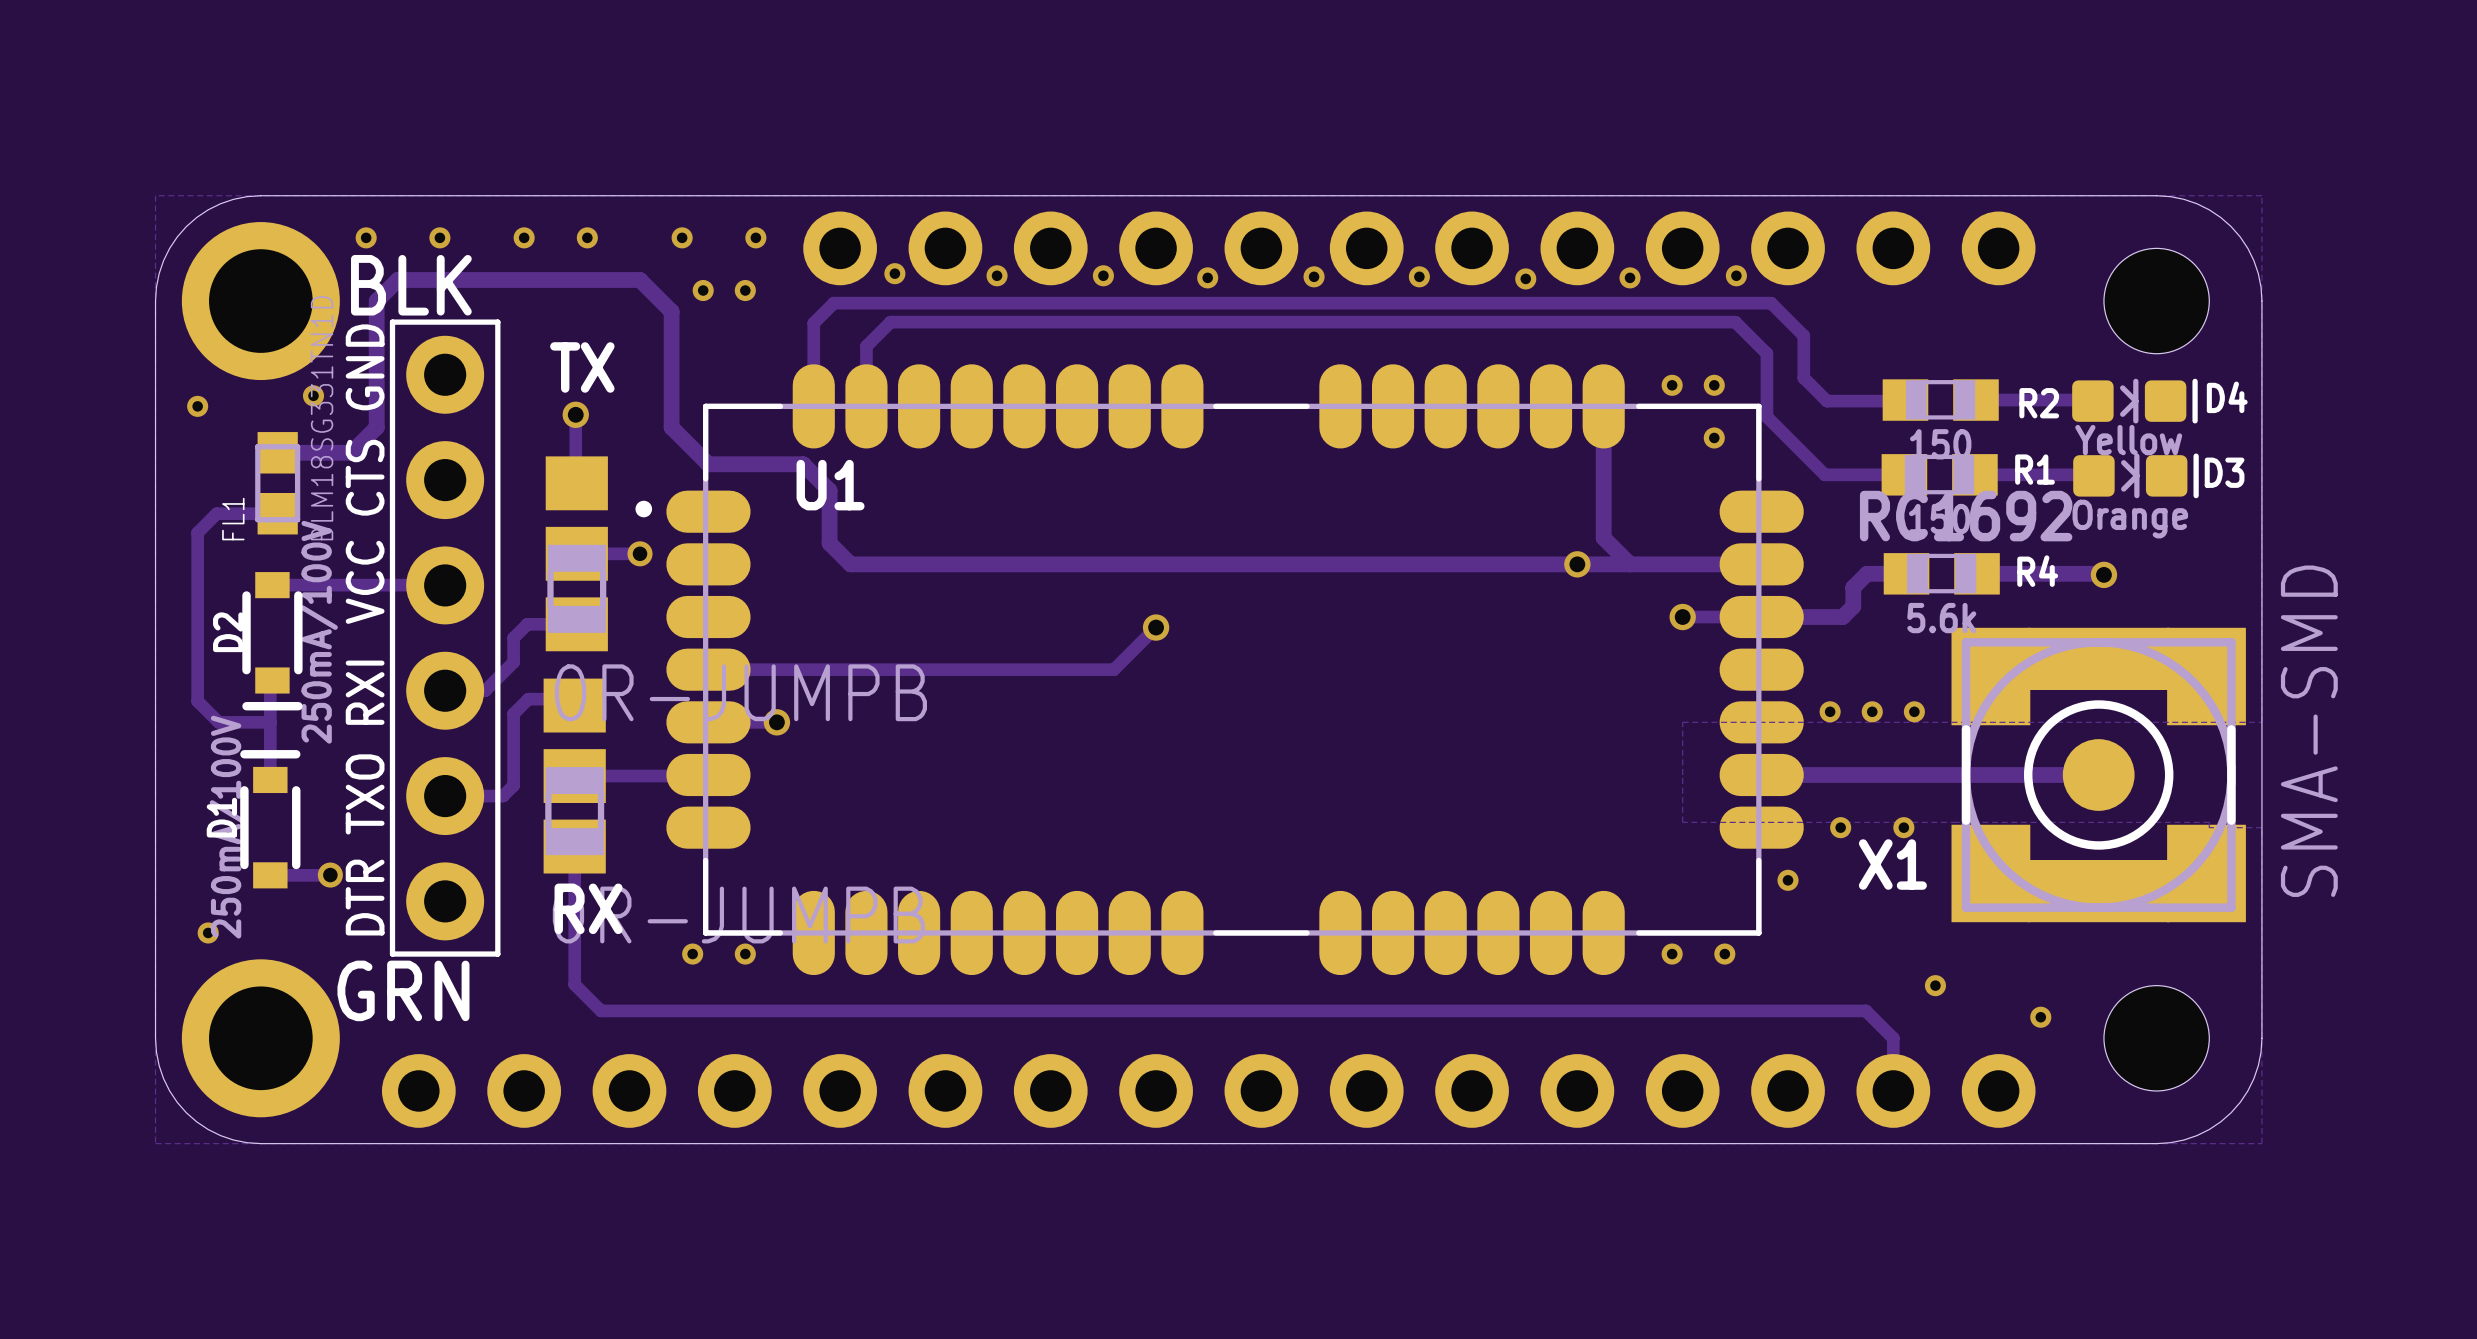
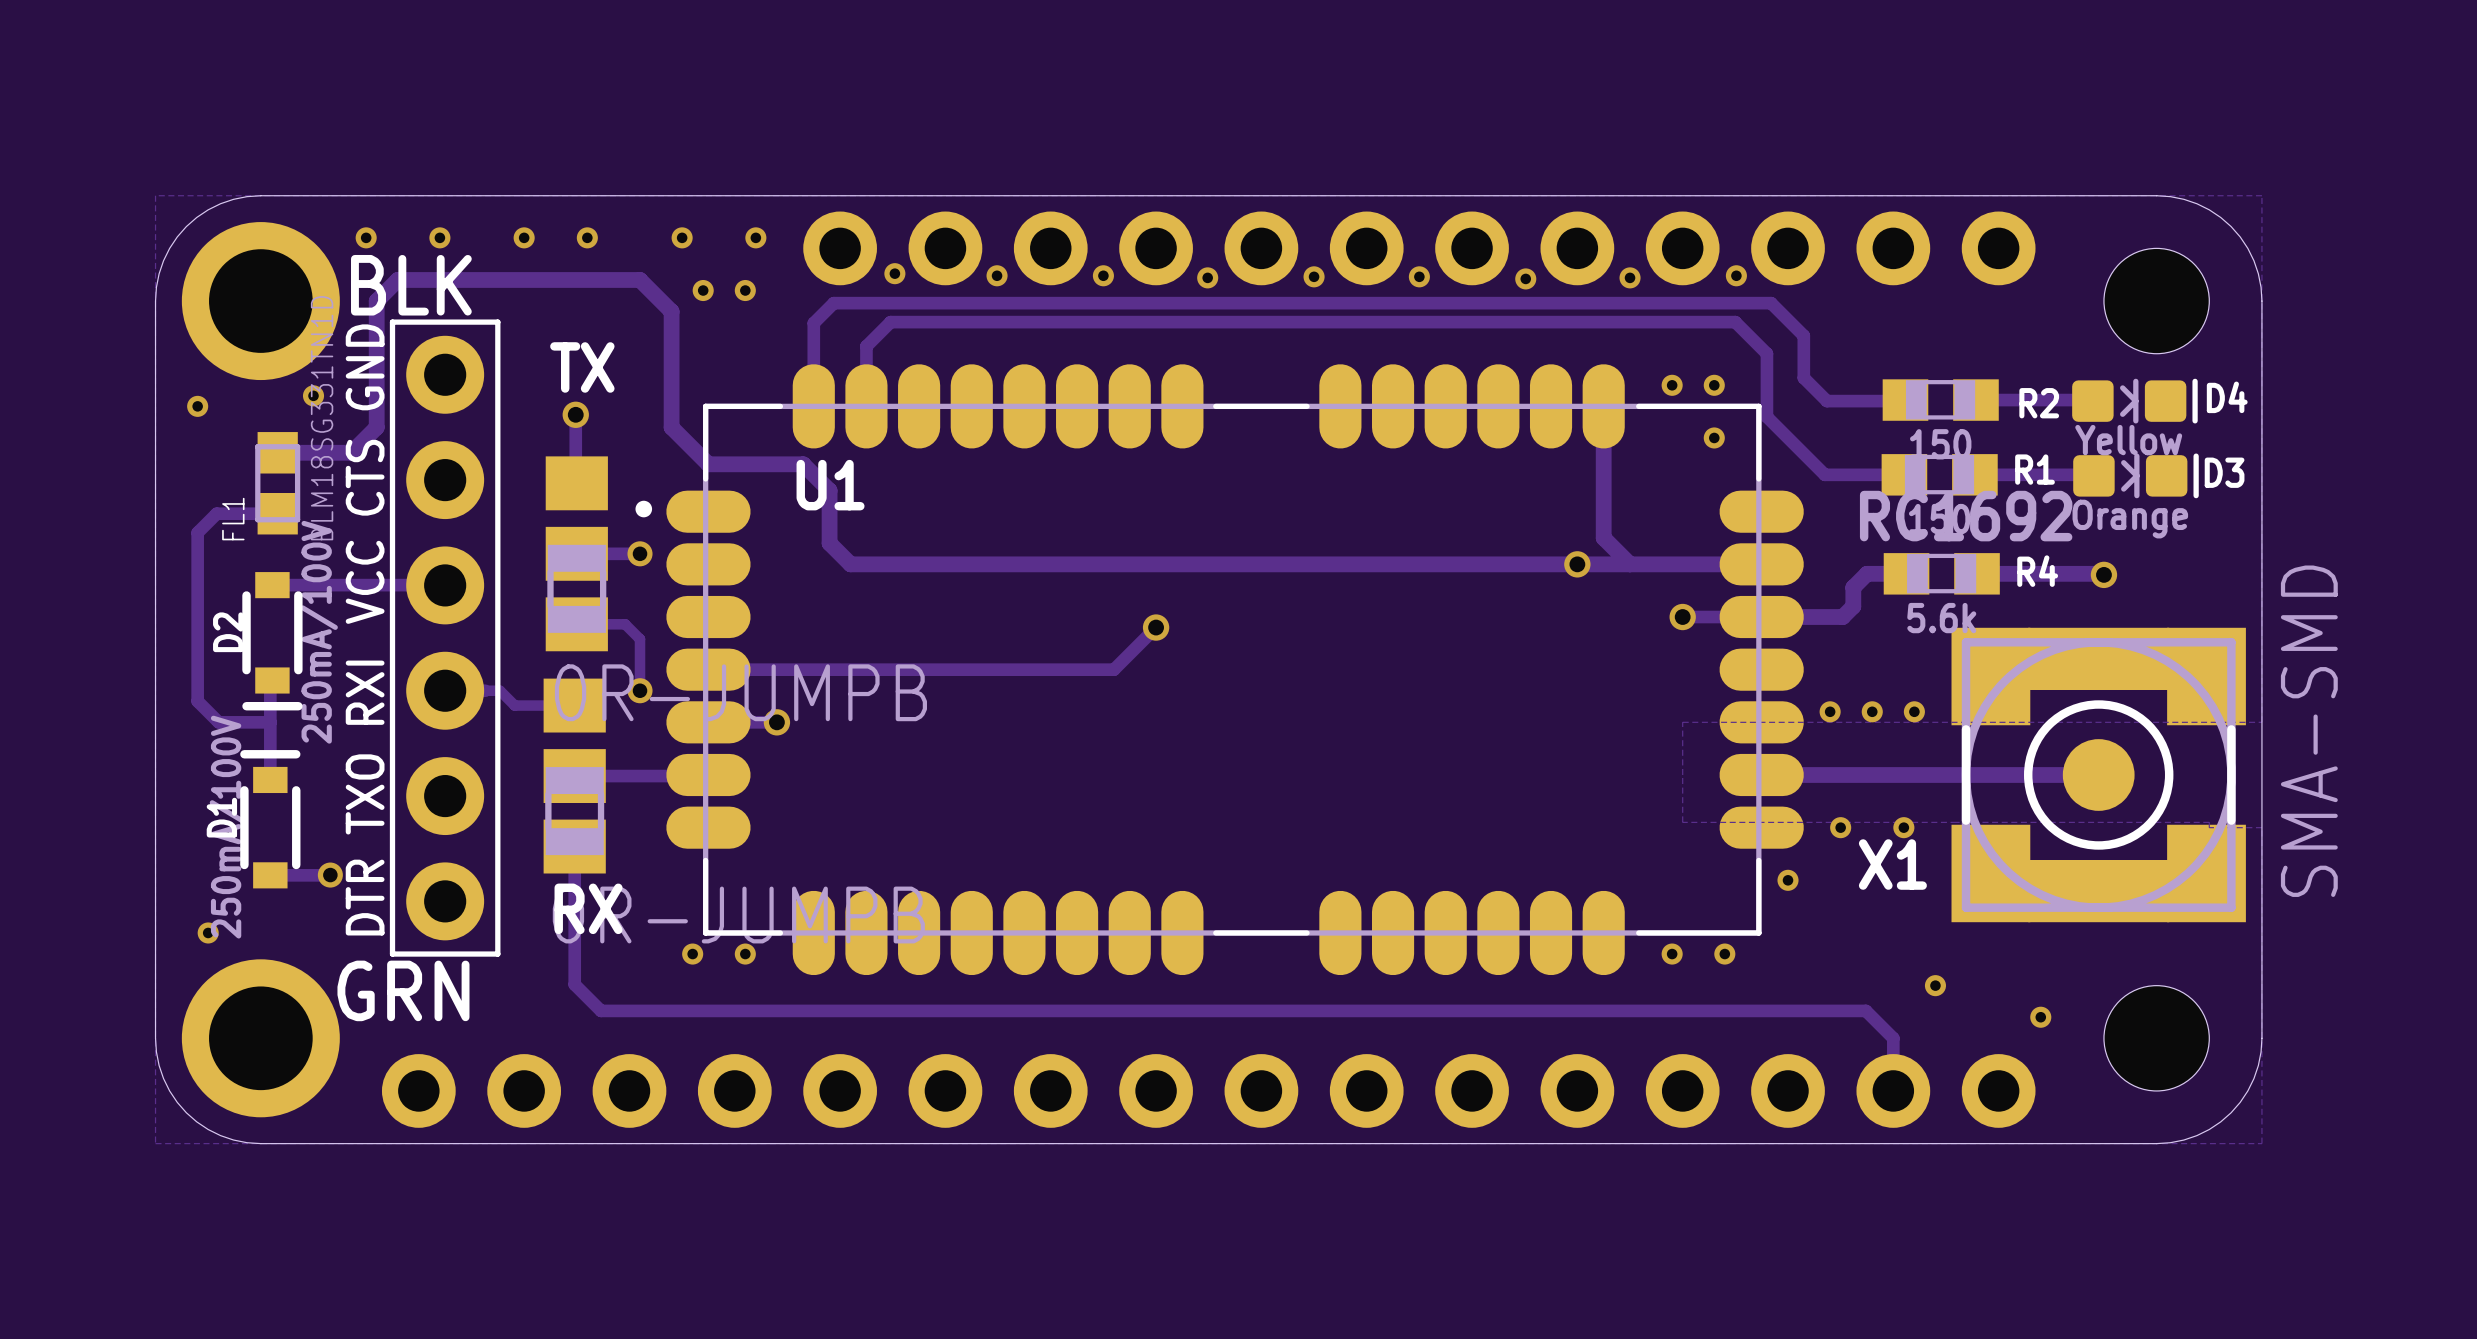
track: (576, 624) (527, 624) (513, 638) (513, 662) (485, 690) -> (574, 705) (514, 705) (499, 690) (485, 690)
track: none -> (576, 624) (625, 624) (640, 639) (640, 690)
via: none -> (640, 690)
track: (574, 705) (568, 699) (528, 699) (513, 713) (513, 785) (503, 796) (445, 796) -> none

